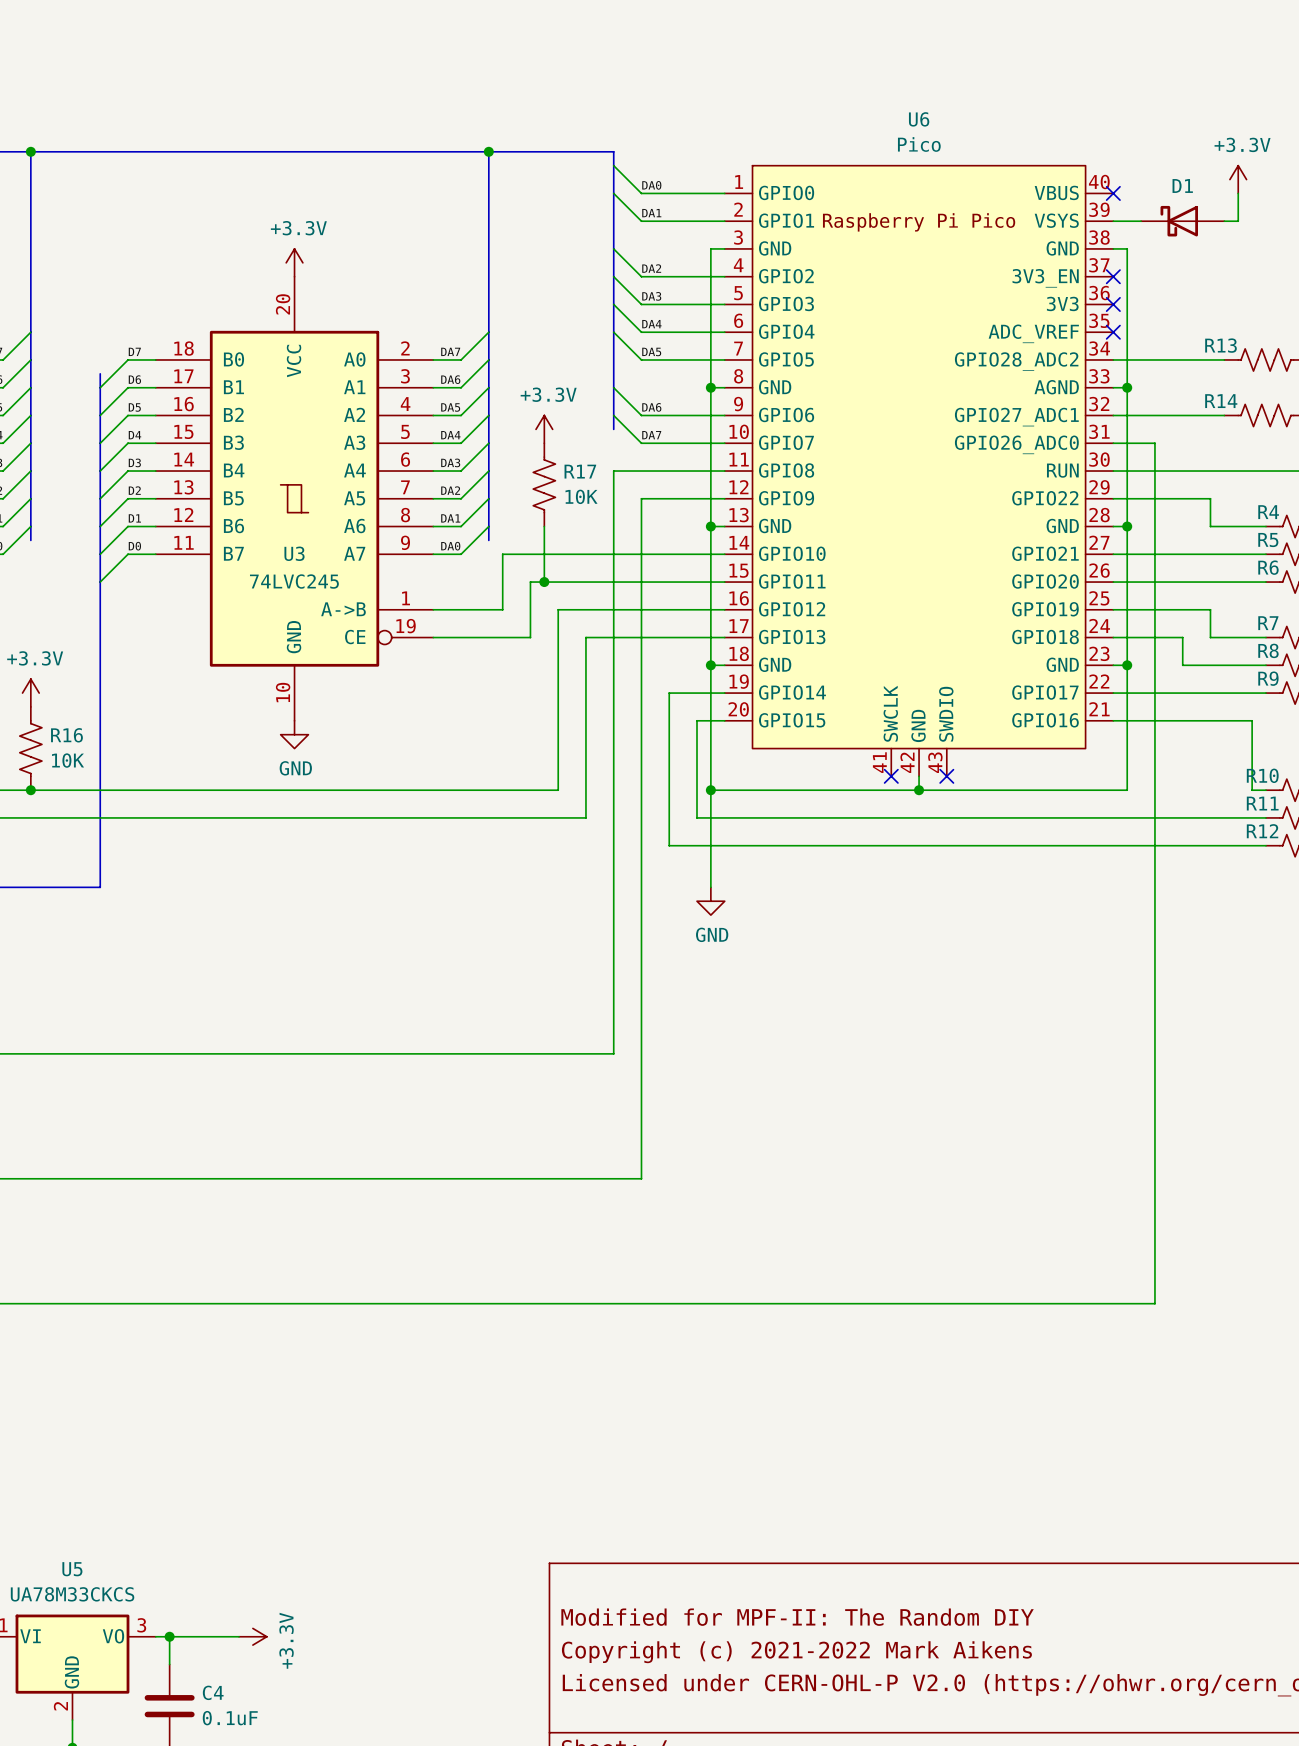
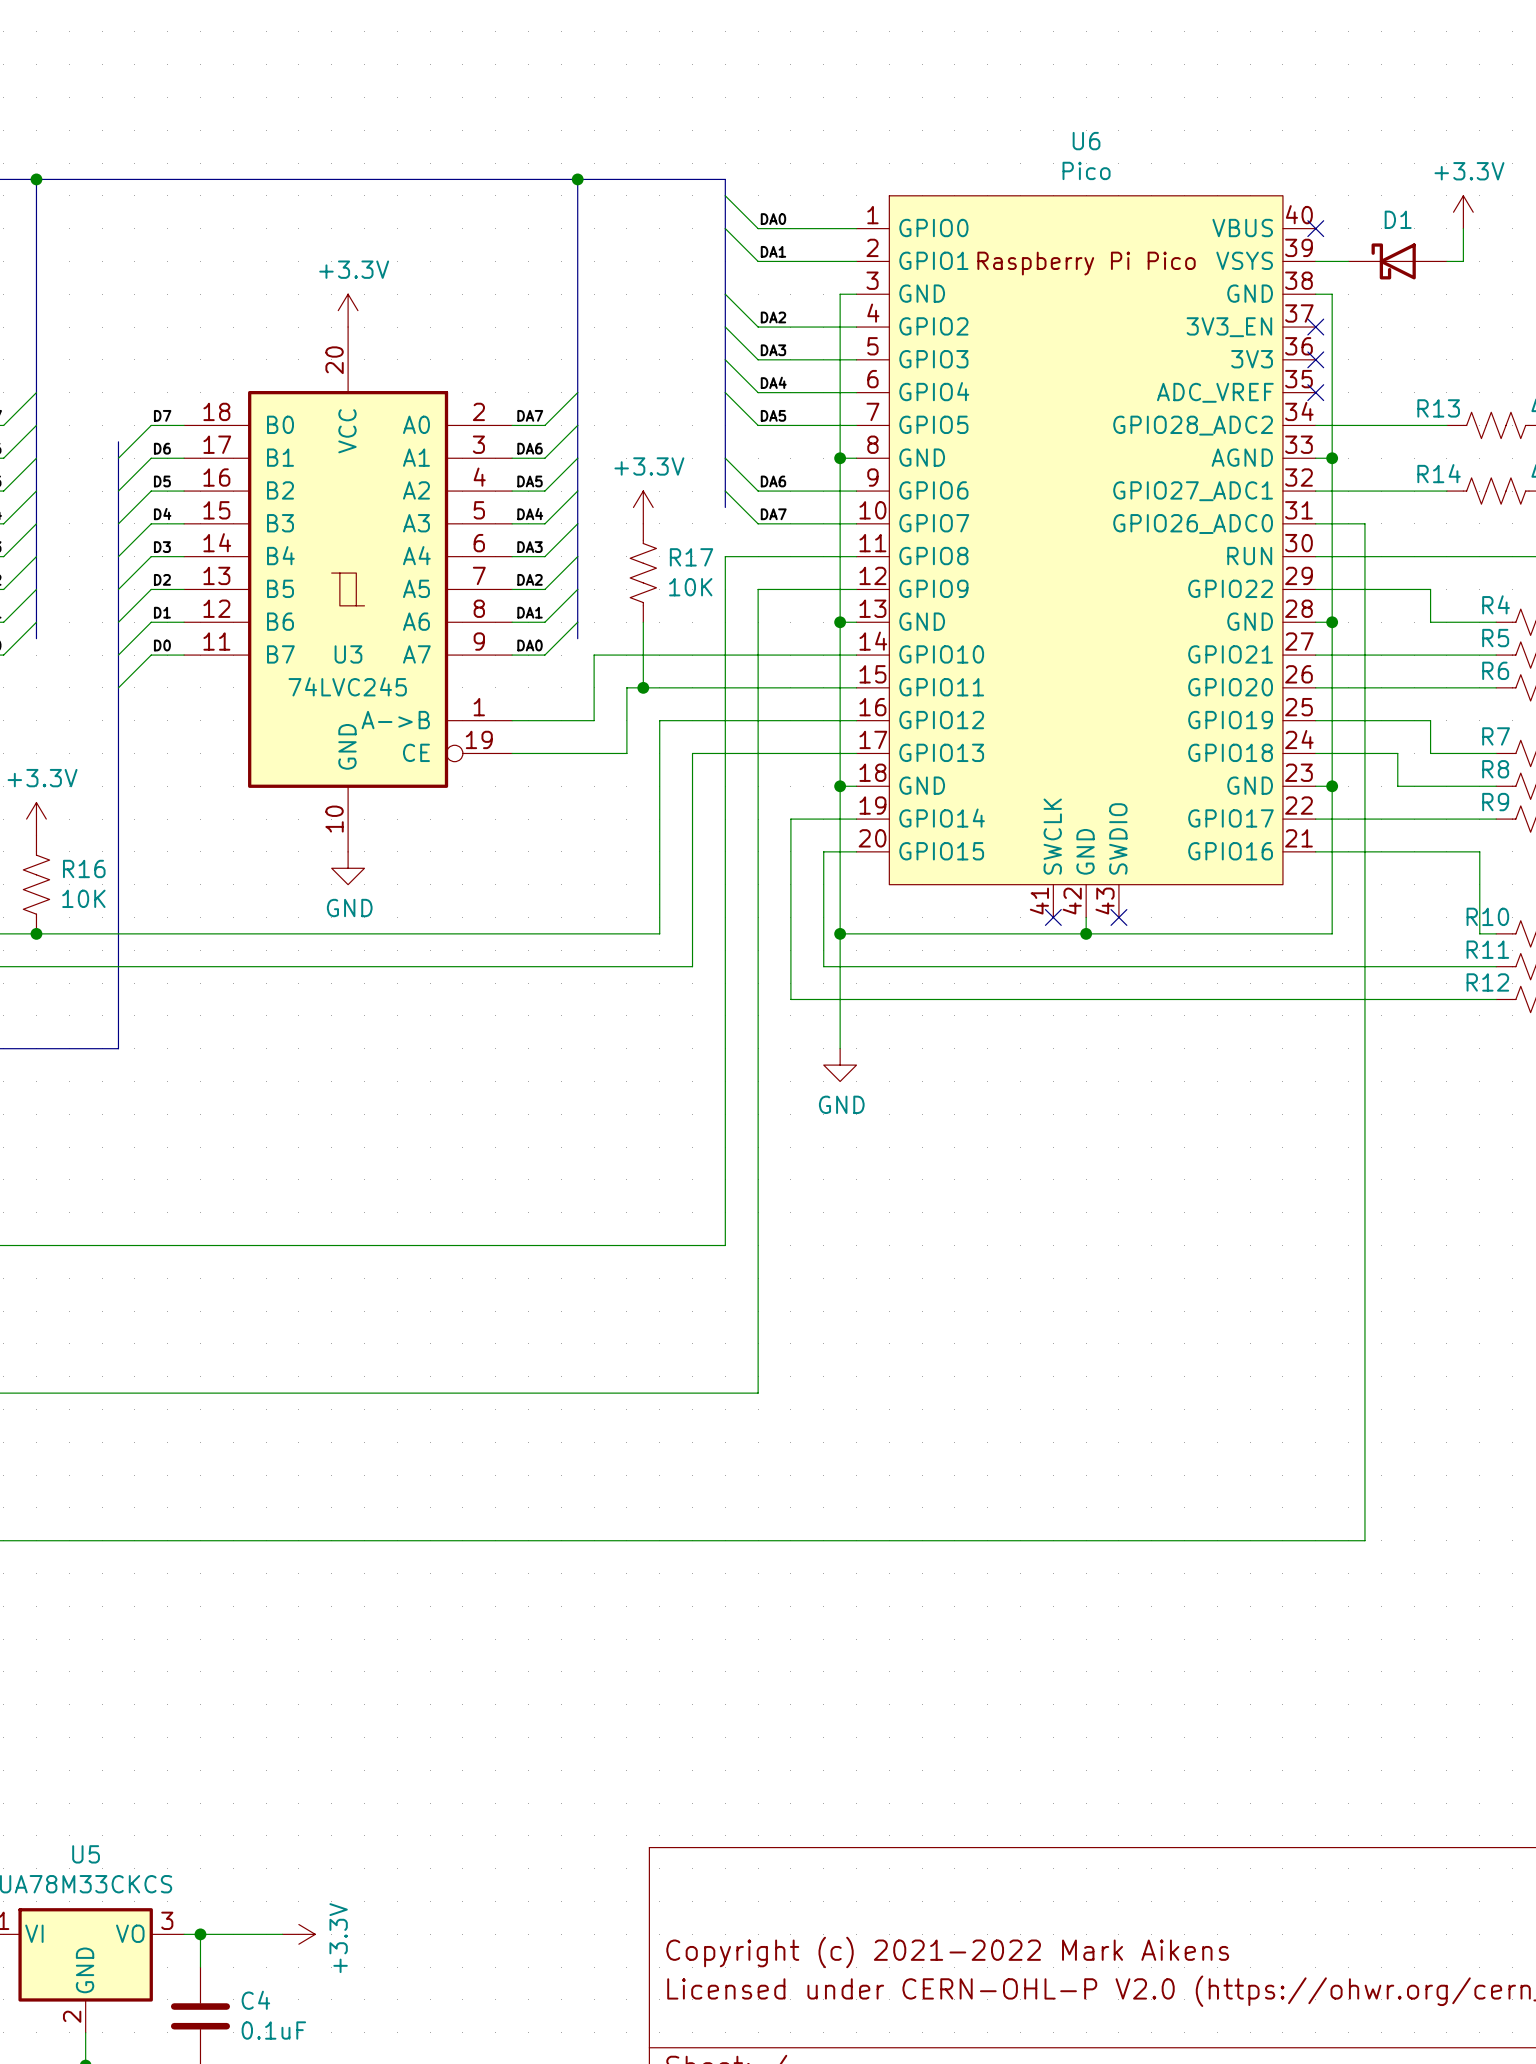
title block: Modified for MPF-II: The Random DIY (797, 1617) -> none

